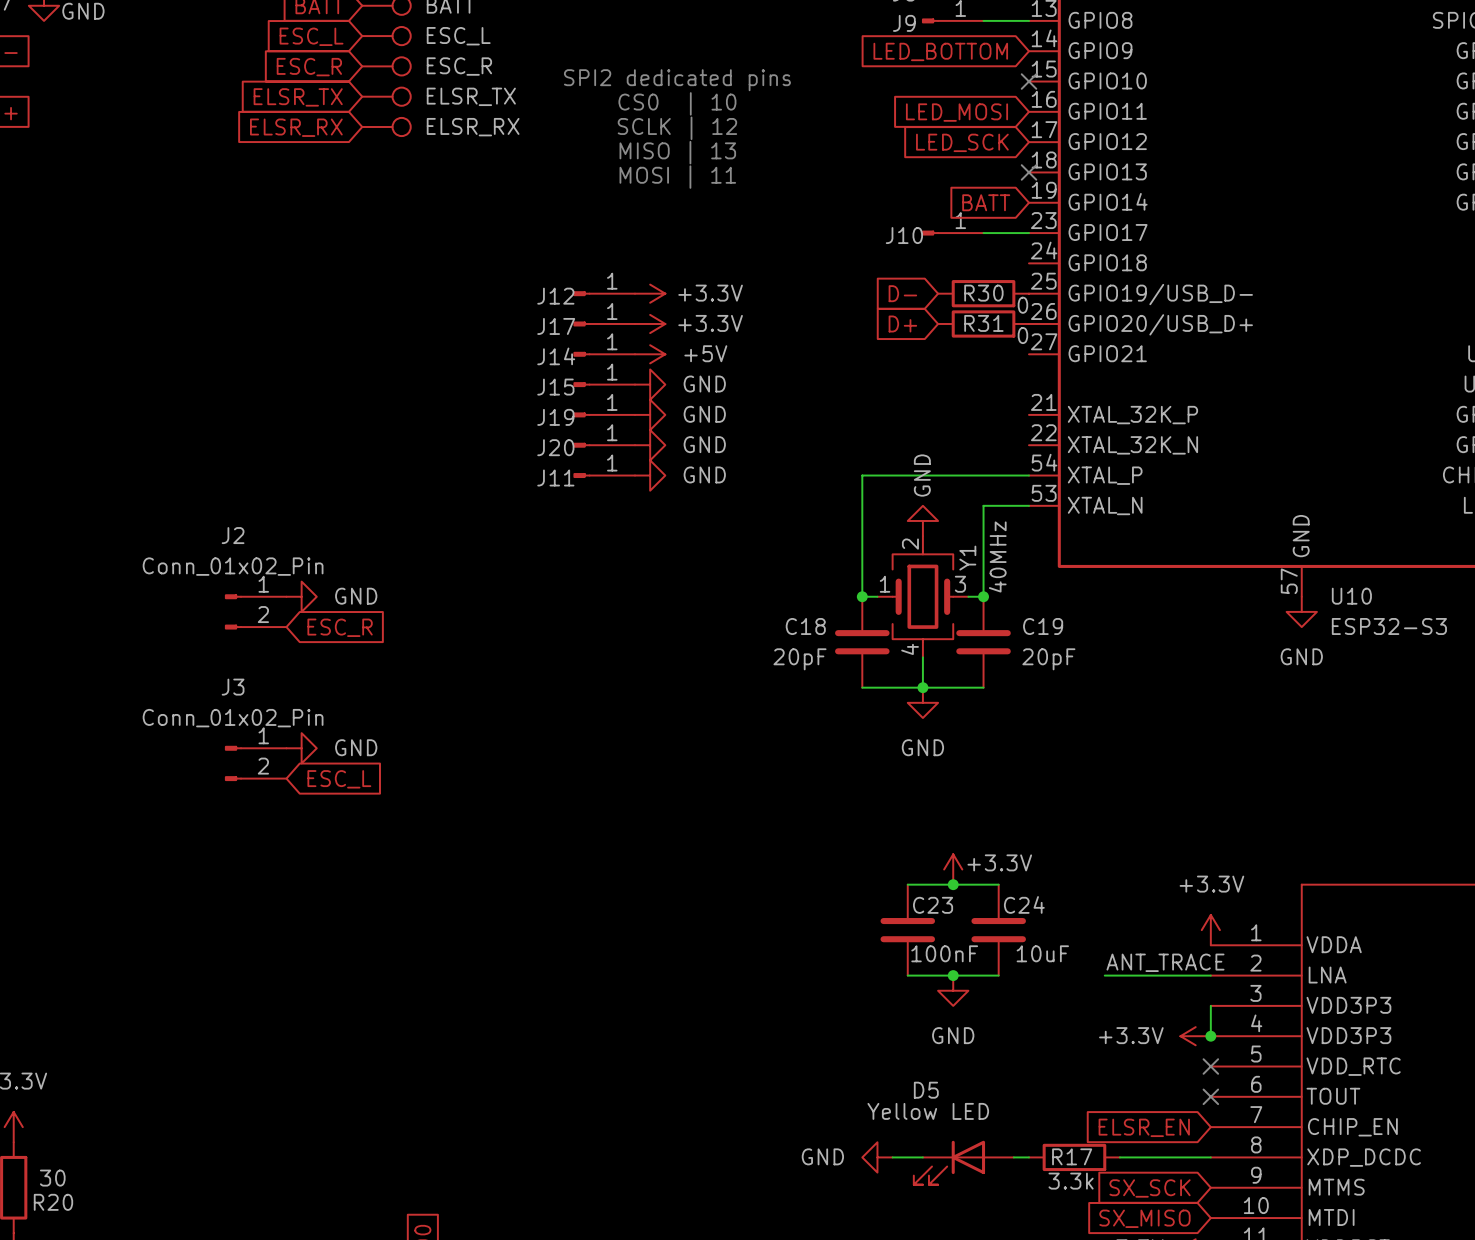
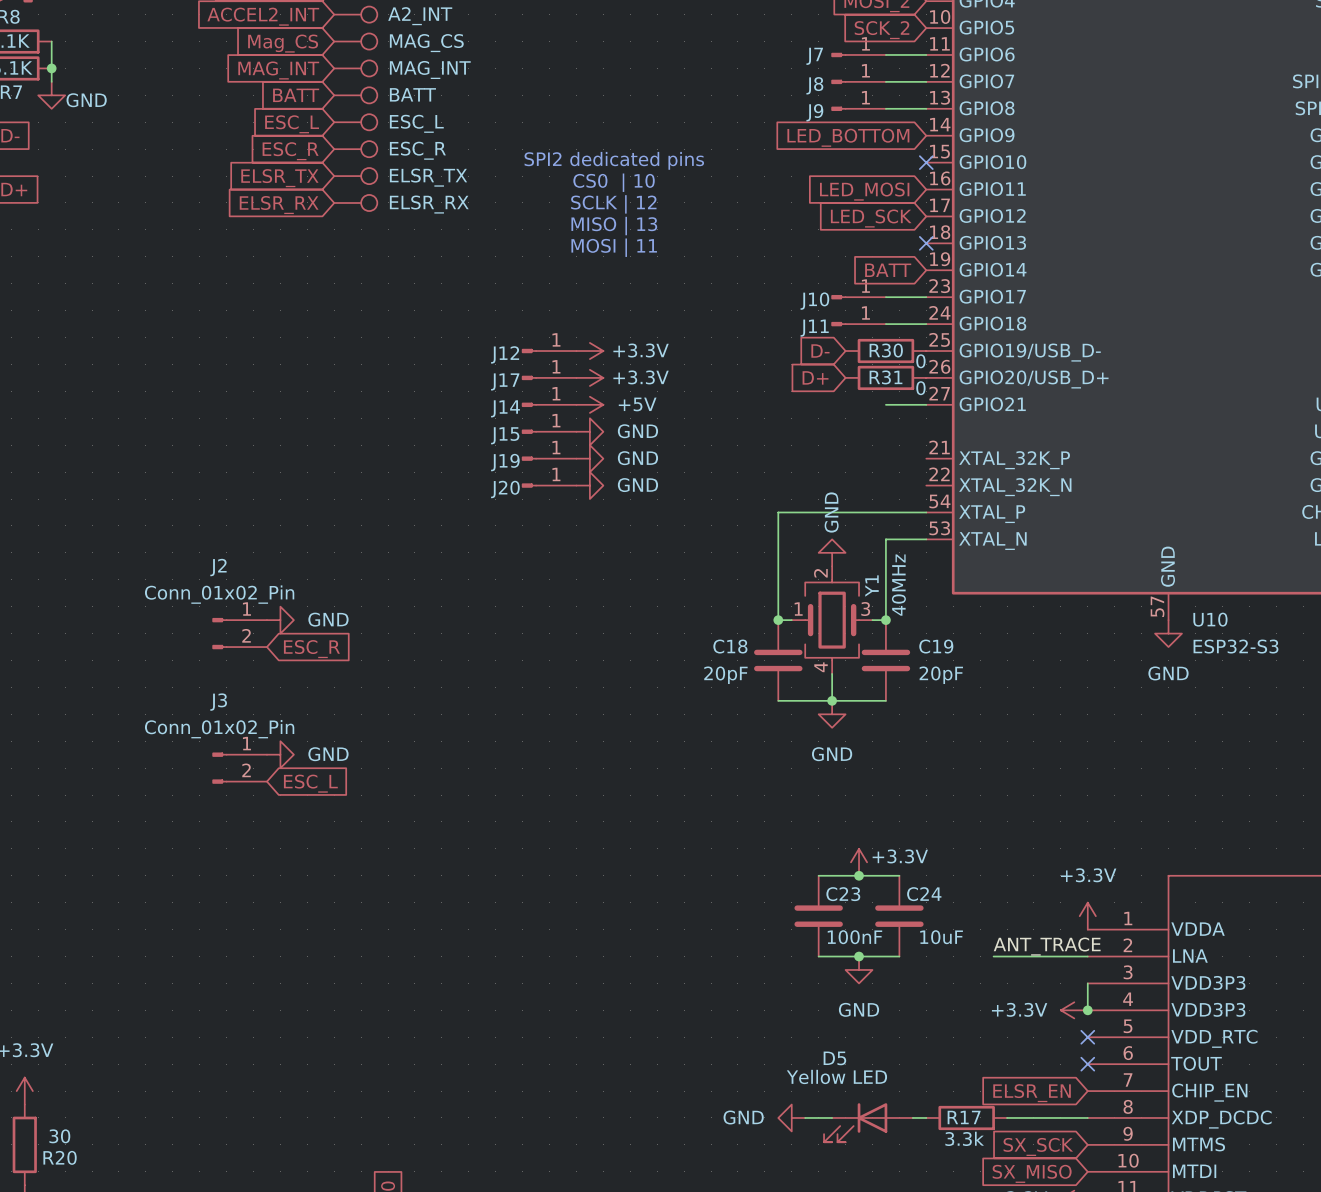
wire: none -> (885, 324) (926, 324)
wire: none -> (885, 404) (926, 404)
J11 position: (604, 475) -> (858, 324)
power symbol: GND (650, 475) -> none

